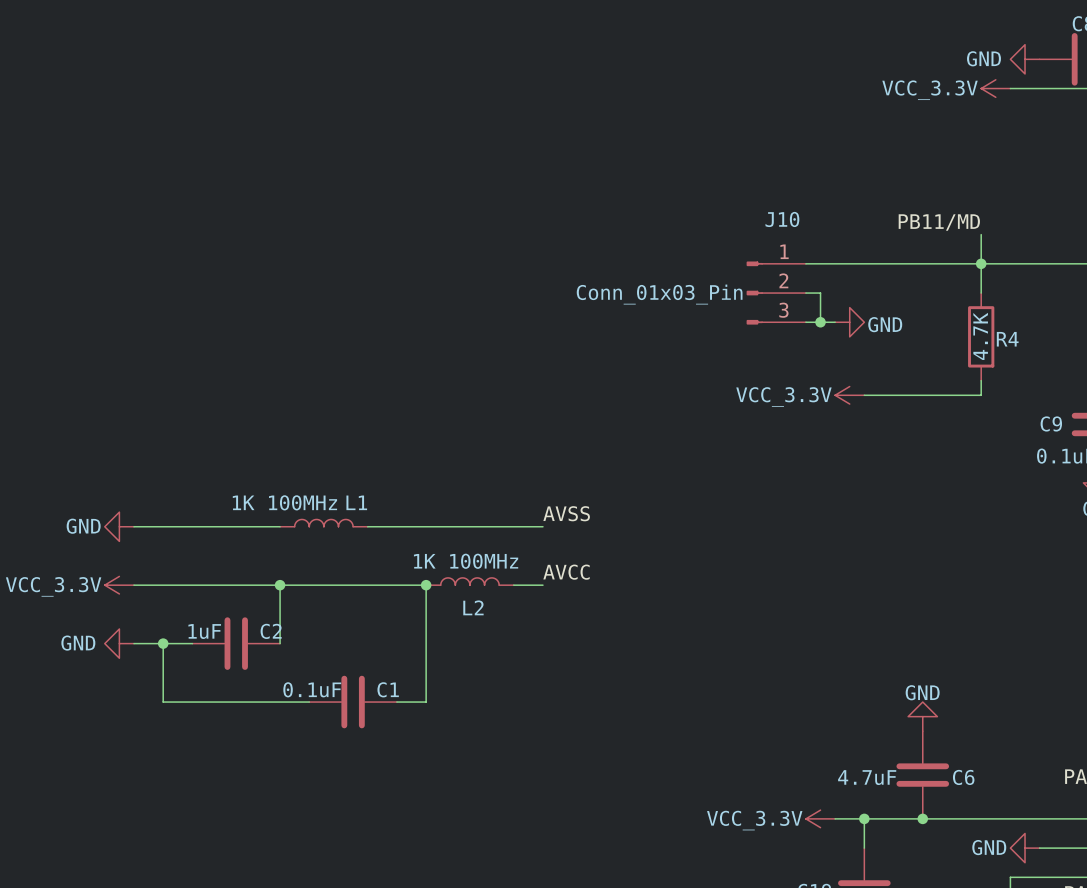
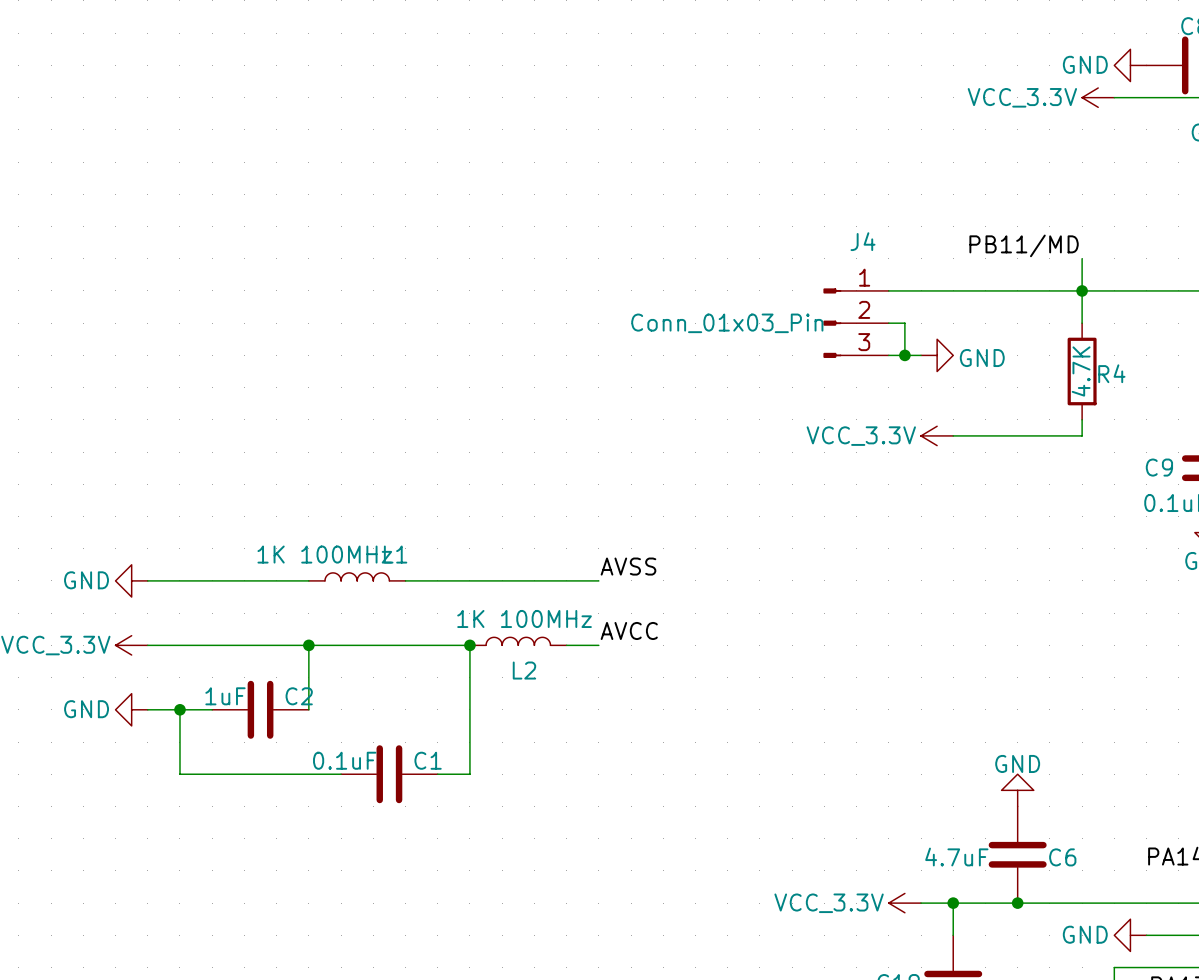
J10 name: J10 (782, 219) -> J4 (863, 241)

